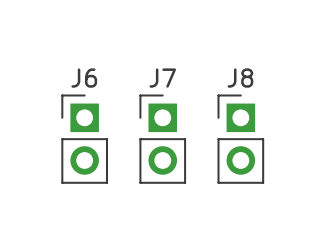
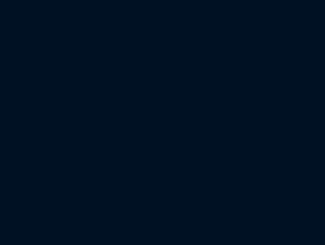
J6: (84, 139) -> none
J7: (162, 139) -> none
J8: (240, 139) -> none

